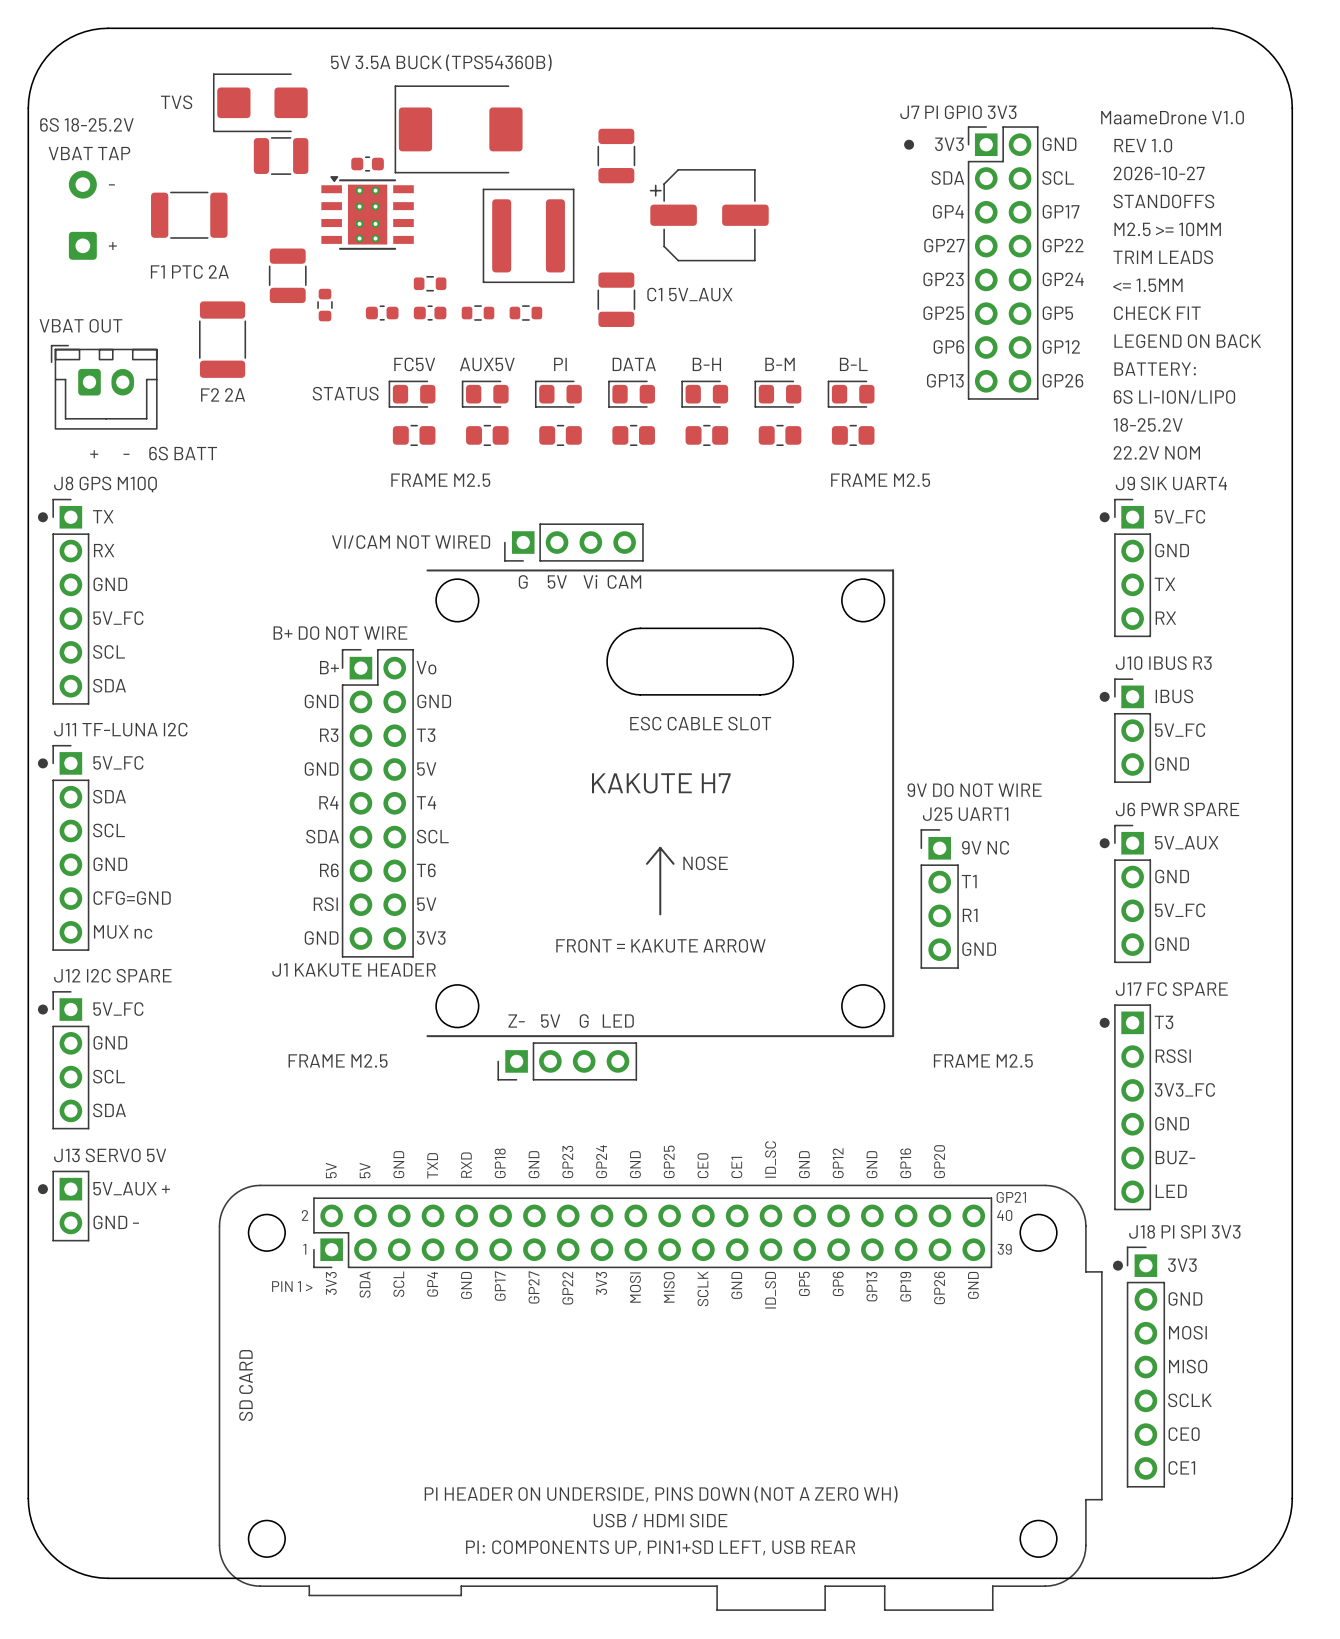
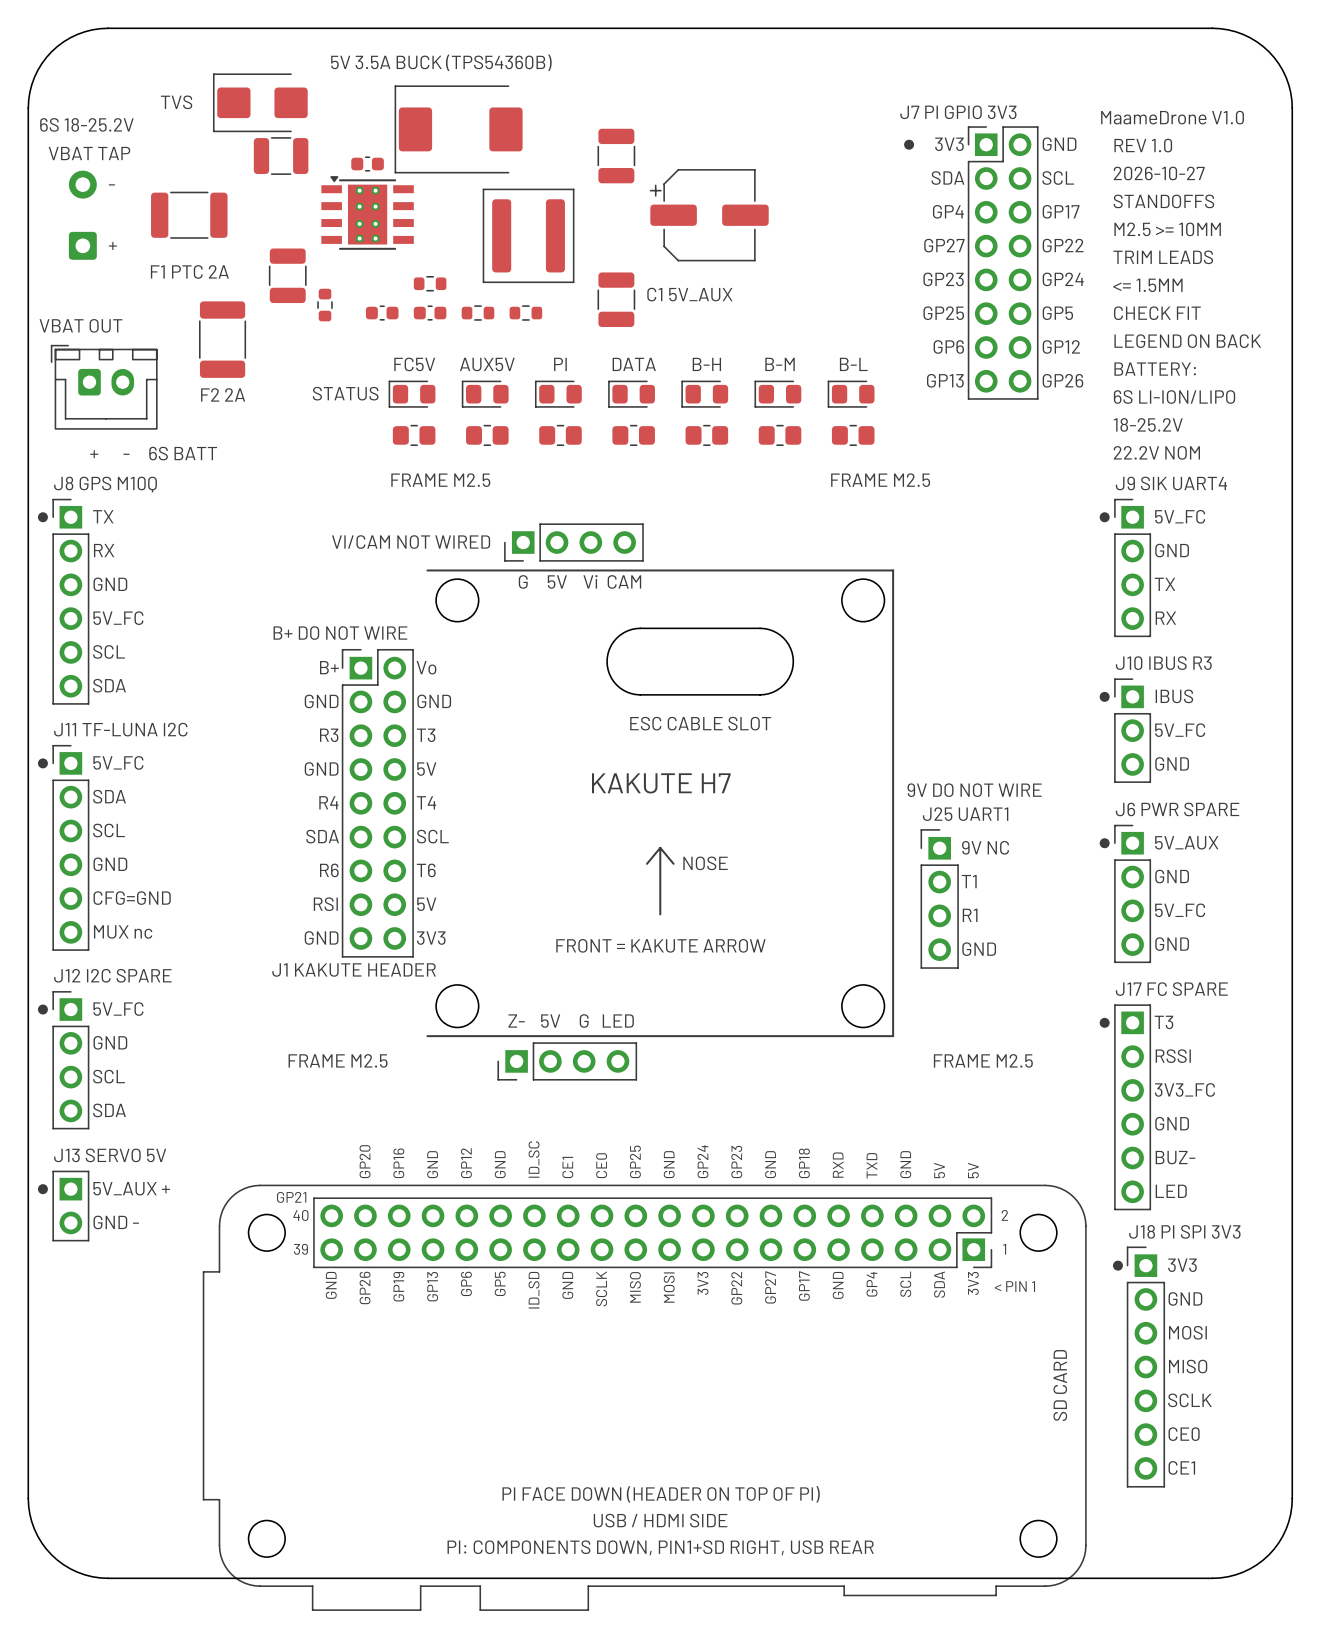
text: ID_SC (770, 1159) -> GND (770, 1164)
text: GP23 (567, 1161) -> CE1 (567, 1167)
text: GP24 (601, 1161) -> CE0 (601, 1165)
text: GP25 (669, 1161) -> GND (669, 1164)
text: GP20 (939, 1161) -> 5V (939, 1170)
text: GP18 (500, 1163) -> GND (500, 1164)
text: GP12 (838, 1163) -> RXD (838, 1165)
text: GP16 (905, 1163) -> GND (905, 1164)
text: GND (398, 1164) -> GP16 (398, 1163)
text: GND (534, 1164) -> ID_SC (534, 1159)
text: GND (635, 1164) -> GP25 (635, 1161)
text: GND (804, 1164) -> GP18 (804, 1163)
text: GND (871, 1164) -> TXD (871, 1165)
text: TXD (432, 1165) -> GND (432, 1164)
text: RXD (466, 1165) -> GP12 (466, 1163)
text: CE0 (703, 1165) -> GP24 (702, 1161)
text: CE1 (736, 1167) -> GP23 (736, 1161)
text: 5V (331, 1170) -> none
text: 5V (365, 1170) -> GP20 (365, 1161)
text: none -> 5V (973, 1170)
text: none -> GP21 (291, 1197)
text: GP21 (1011, 1197) -> none
text: 2 (305, 1215) -> 40 (300, 1215)
text: 40 (1004, 1215) -> 2 (1004, 1215)
text: 1 (304, 1249) -> 39 (300, 1249)
text: 39 (1004, 1249) -> 1 (1004, 1249)
text: 3V3 (331, 1283) -> GND (331, 1285)
text: 3V3 (601, 1283) -> SCLK (601, 1288)
text: GP5 (804, 1283) -> GP17 (804, 1286)
text: GP6 (838, 1283) -> GND (838, 1285)
text: SDA (365, 1284) -> GP26 (365, 1287)
text: SCL (398, 1284) -> GP19 (398, 1286)
text: GP4 (432, 1284) -> GP13 (432, 1286)
text: GND (466, 1285) -> GP6 (466, 1283)
text: GND (736, 1285) -> GP22 (736, 1288)
text: GND (973, 1285) -> 3V3 (973, 1283)
text: PIN 1 > (292, 1286) -> none
text: GP17 (500, 1286) -> GP5 (500, 1283)
text: GP13 (871, 1286) -> GP4 (871, 1284)
text: GP19 (905, 1286) -> SCL (905, 1284)
text: none -> < PIN 1 (1014, 1286)
text: GP27 (534, 1287) -> ID_SD (534, 1290)
text: MOSI (635, 1287) -> MISO (635, 1287)
text: MISO (669, 1287) -> MOSI (669, 1287)
text: GP26 (939, 1287) -> SDA (939, 1284)
text: GP22 (567, 1288) -> GND (567, 1285)
text: SCLK (703, 1288) -> 3V3 (703, 1283)
text: ID_SD (770, 1290) -> GP27 (770, 1287)
text: SD CARD (246, 1385) -> none
text: none -> SD CARD (1060, 1385)
part: none -> (644, 1397)
part: (660, 1397) -> none
text: PI HEADER ON UNDERSIDE, PINS DOWN (NOT A ZERO WH) (661, 1494) -> PI FACE DOWN (HEADER ON TOP OF PI) (661, 1494)
text: PI: COMPONENTS UP, PIN1+SD LEFT, USB REAR (660, 1547) -> PI: COMPONENTS DOWN, PIN1+SD RIGHT, USB REAR (660, 1547)

